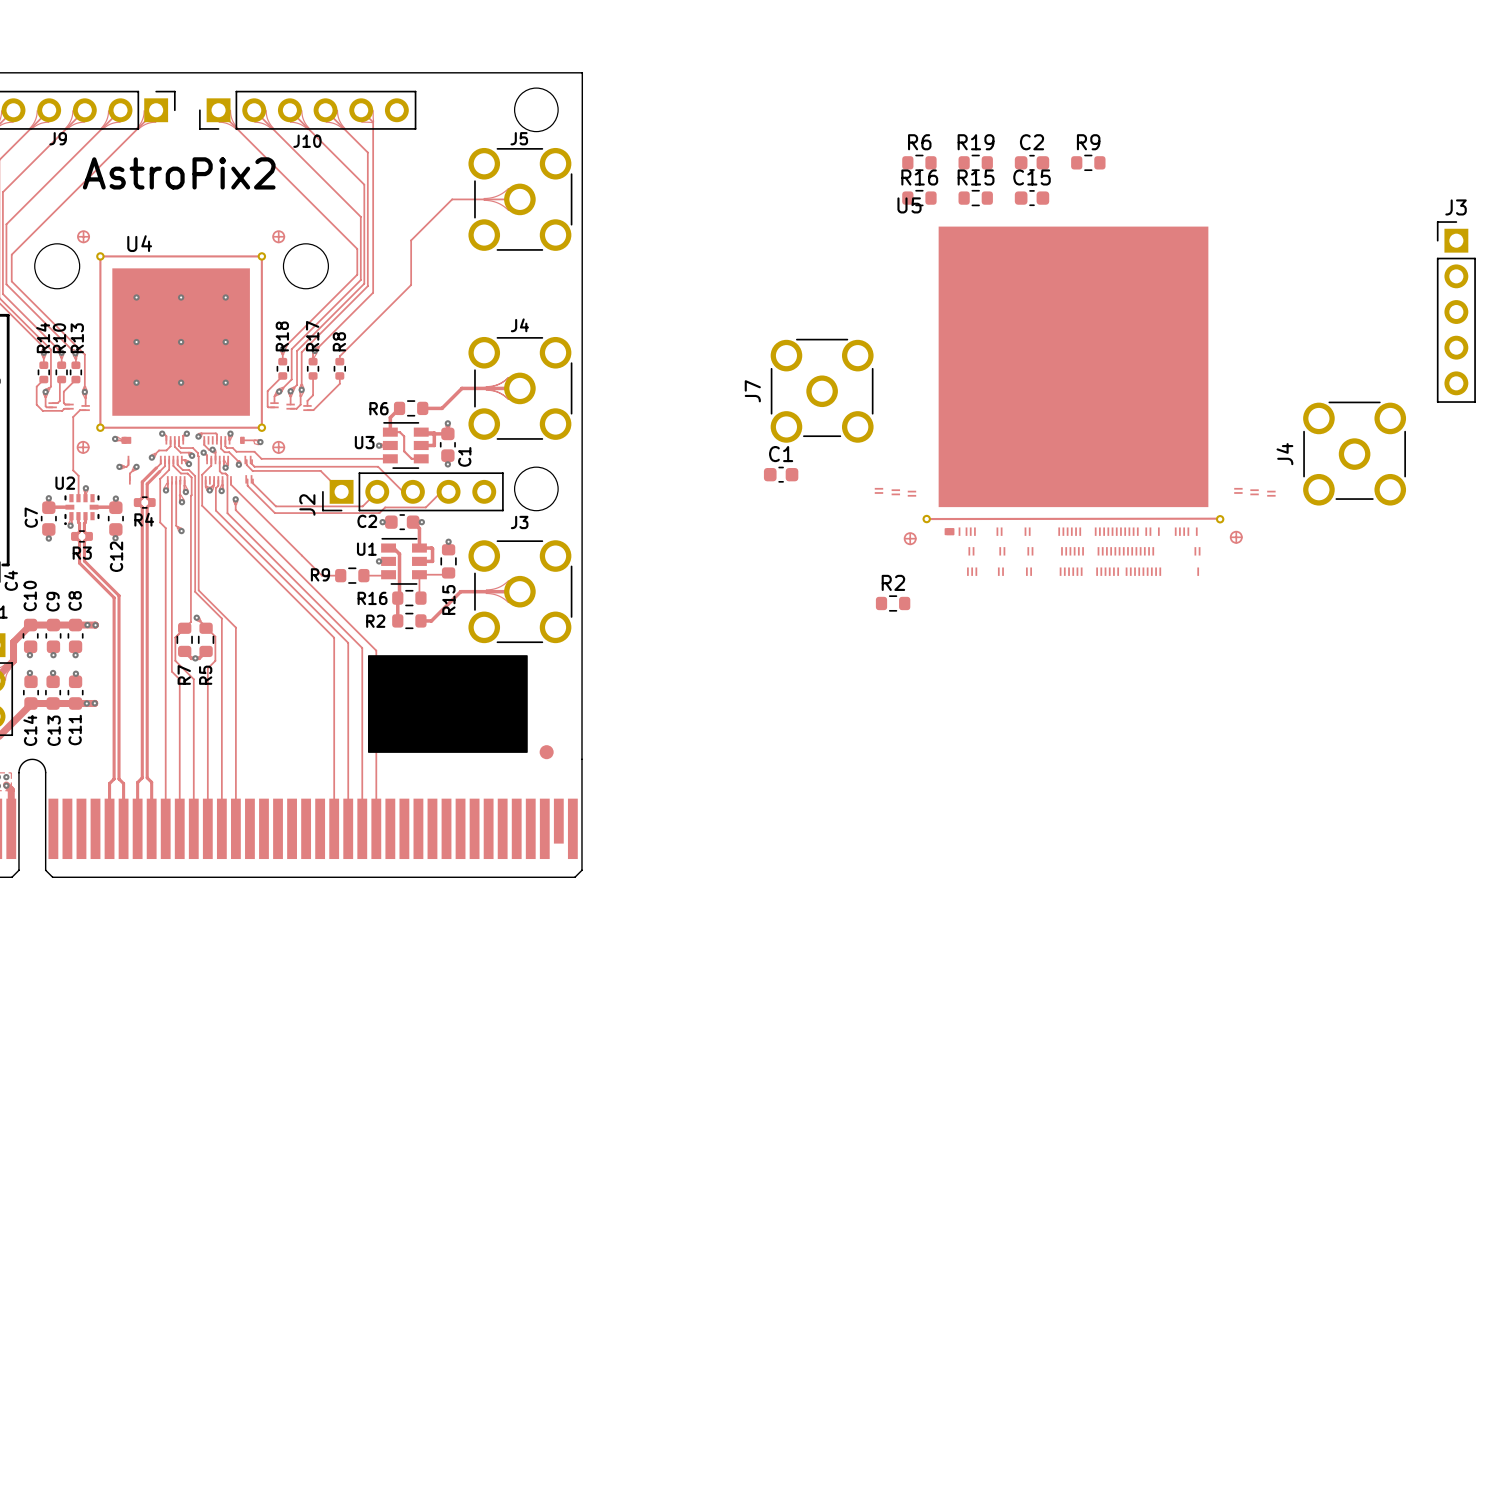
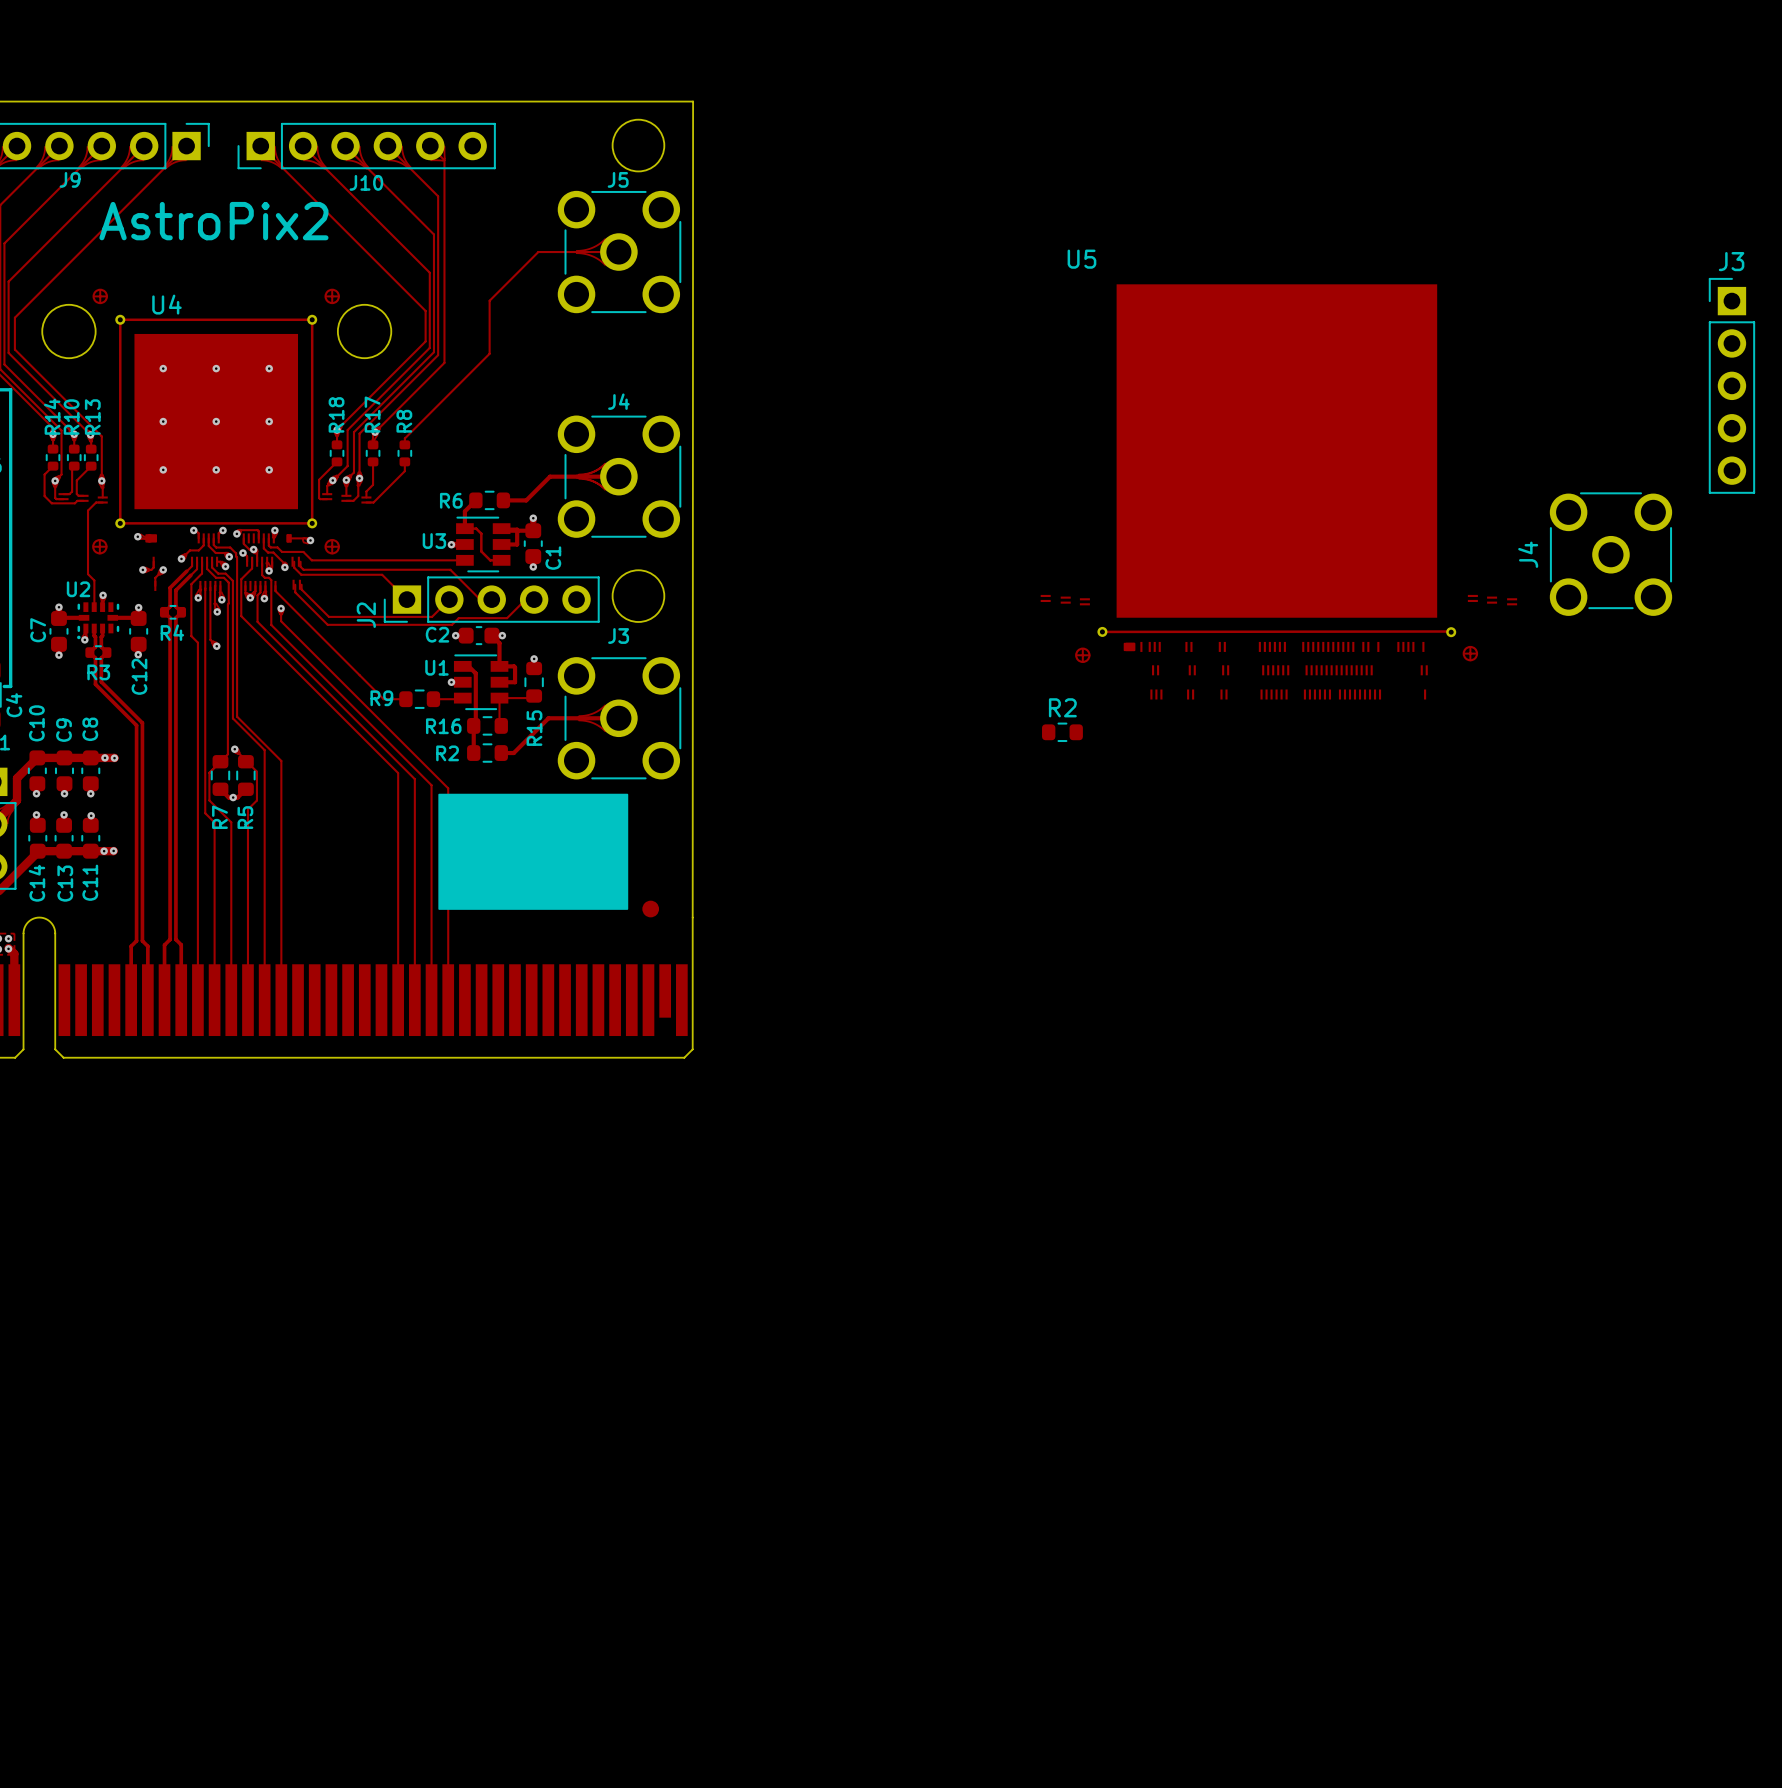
R6: (919, 162) -> none
R19: (975, 162) -> none
C2: (1032, 162) -> none
R9: (1088, 162) -> none
R16: (919, 198) -> none
R15: (975, 198) -> none
C15: (1032, 198) -> none
J7: (822, 390) -> none
C1: (781, 474) -> none

